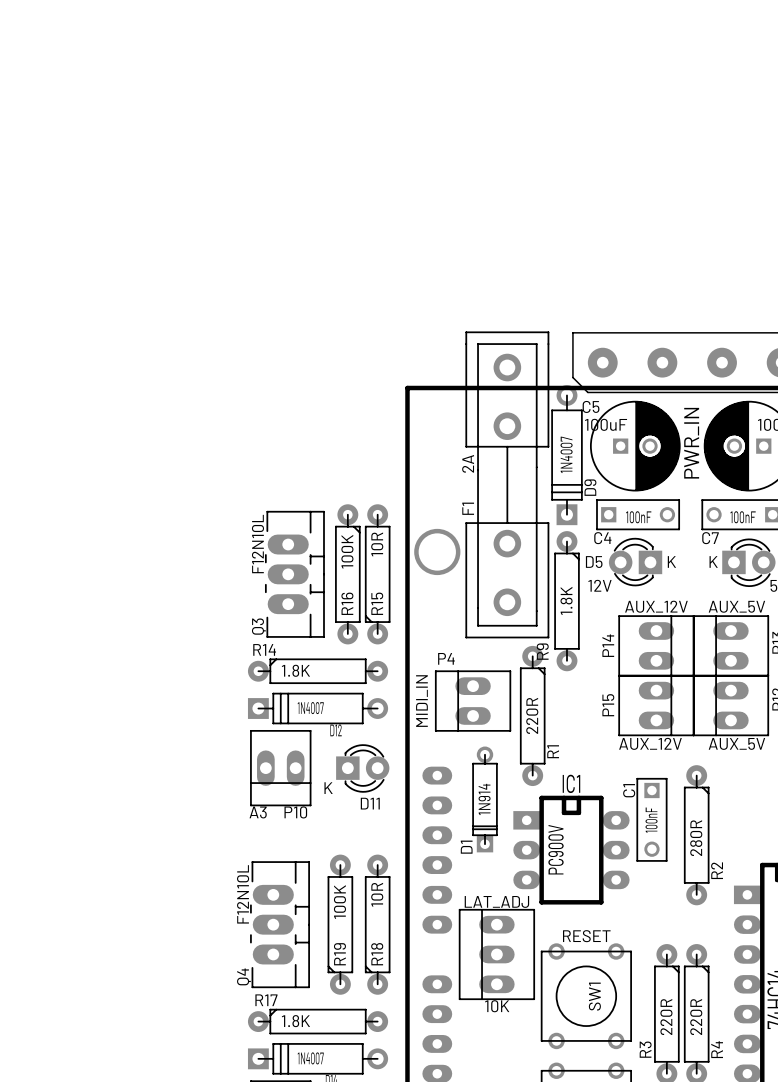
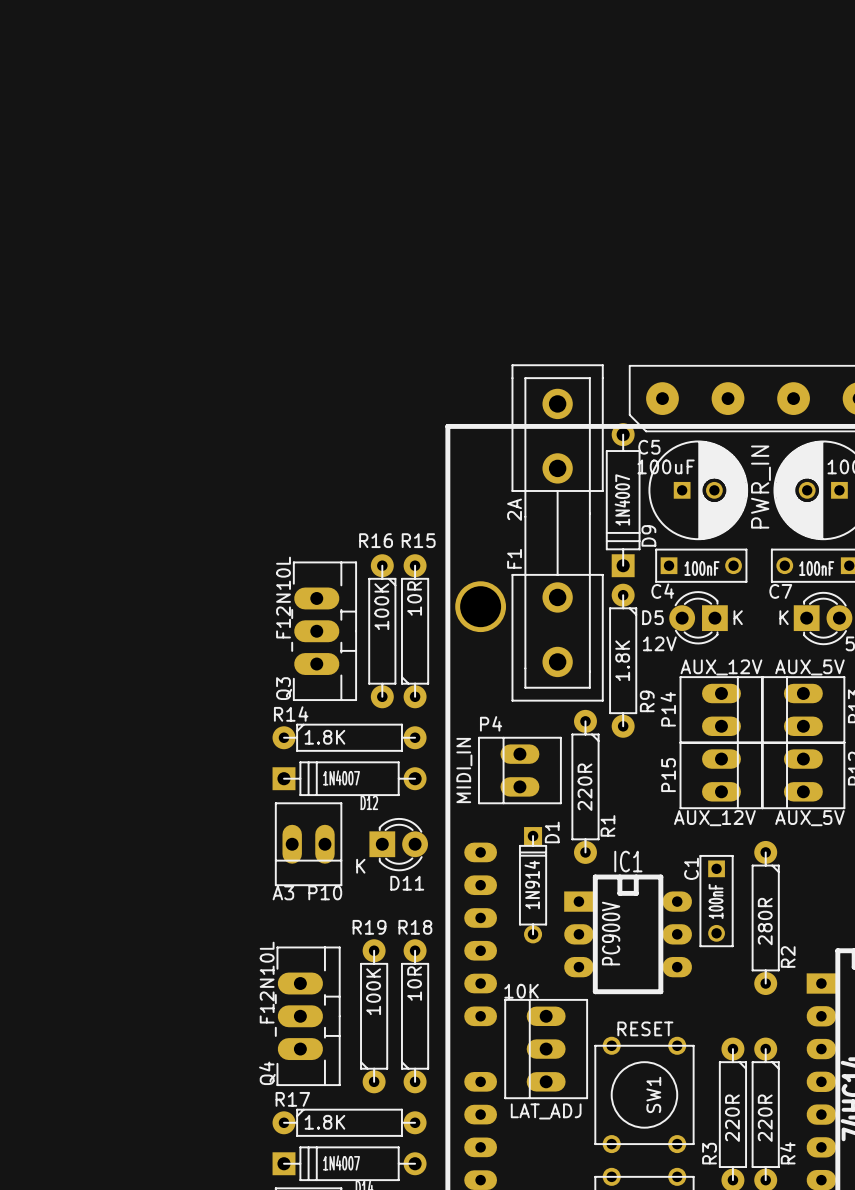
R16 name rotation: 0° (347, 603) -> 90° clockwise (376, 540)
R16 name position: R16 (347, 603) -> R16 (376, 540)
R15 name rotation: 0° (377, 603) -> 90° clockwise (418, 540)
R15 name position: R15 (377, 603) -> R15 (418, 540)
R9 name position: R9 (542, 651) -> R9 (647, 701)
D1 rotation: 0° (485, 799) -> 180° (533, 885)
LAT_ADJ name position: LAT_ADJ (496, 901) -> LAT_ADJ (546, 1111)
R19 name rotation: 0° (339, 954) -> 90° clockwise (369, 927)
R19 name position: R19 (339, 954) -> R19 (369, 927)
R18 name rotation: 0° (377, 954) -> 90° clockwise (415, 927)
R18 name position: R18 (377, 954) -> R18 (415, 927)
LAT_ADJ value position: 10K (497, 1006) -> 10K (521, 991)

